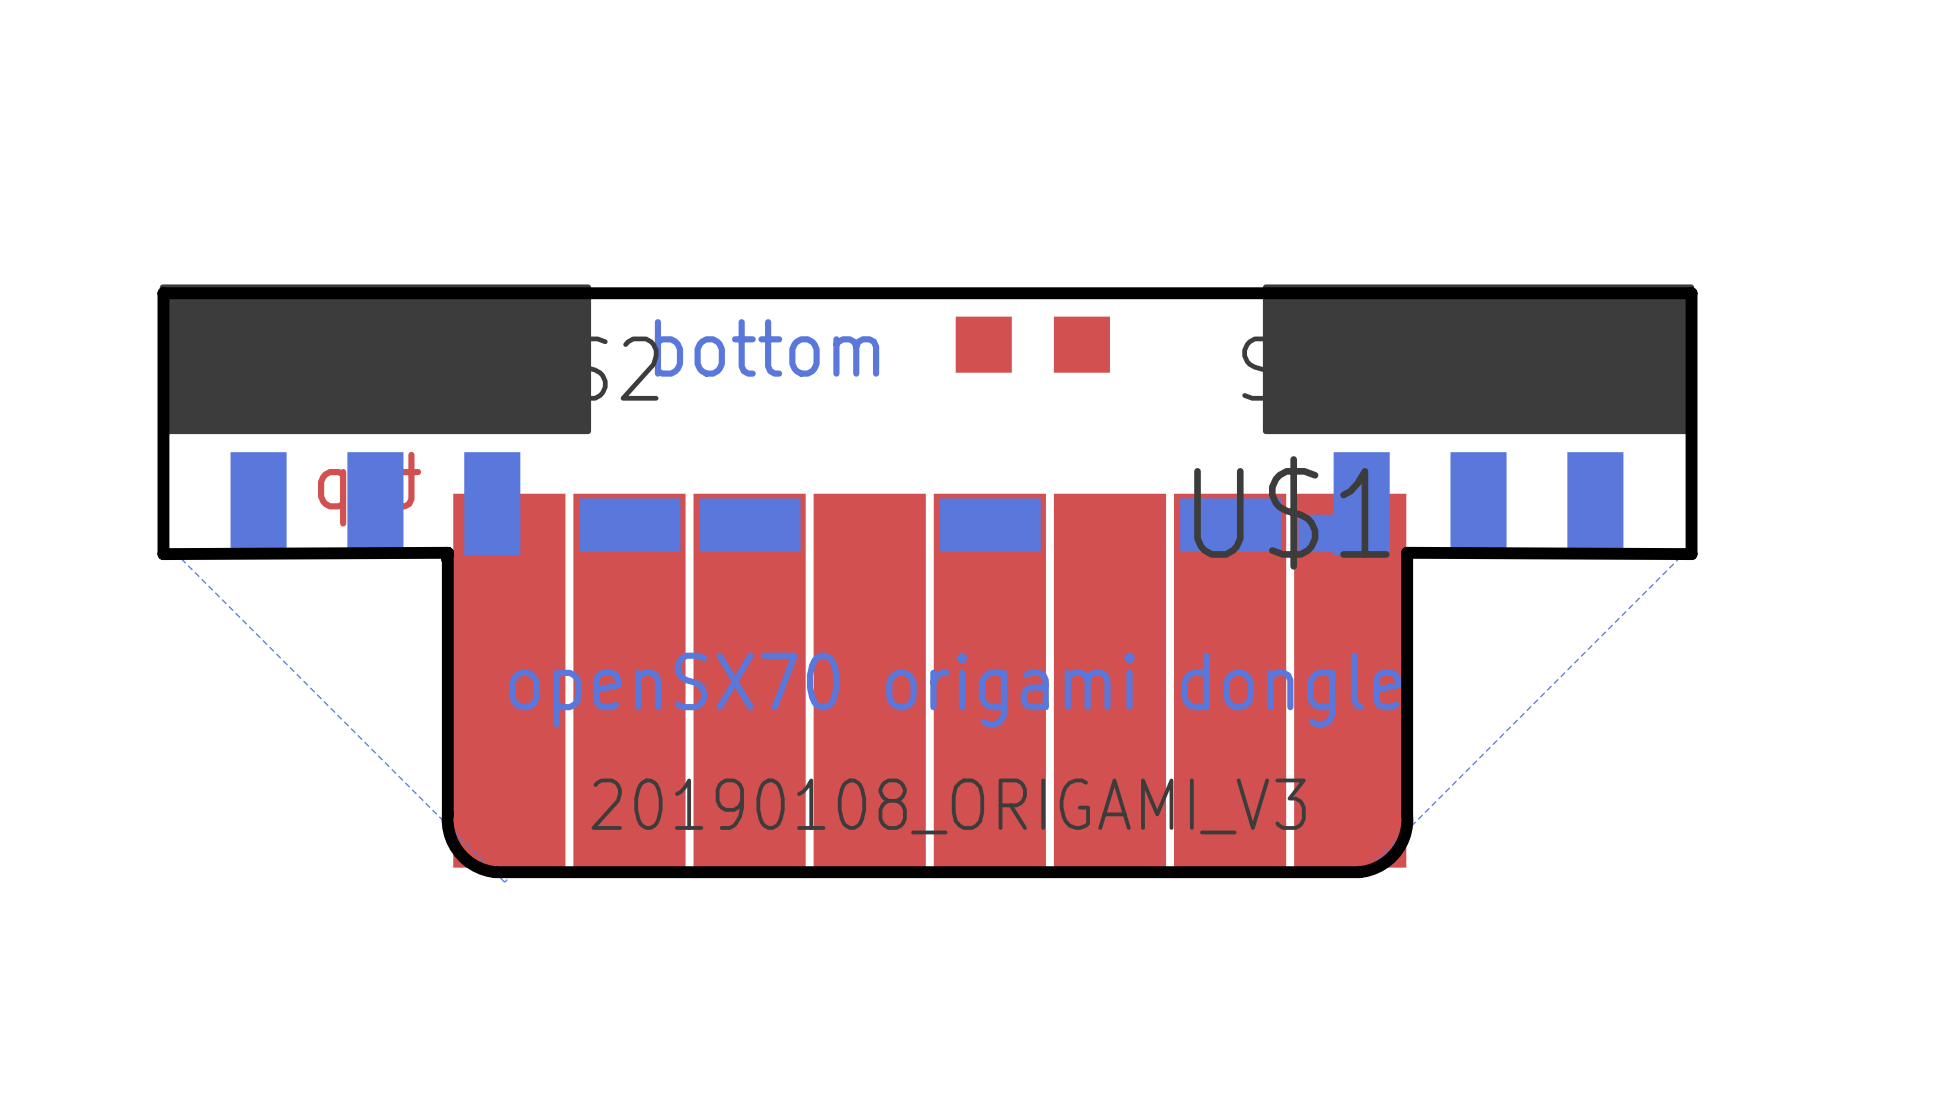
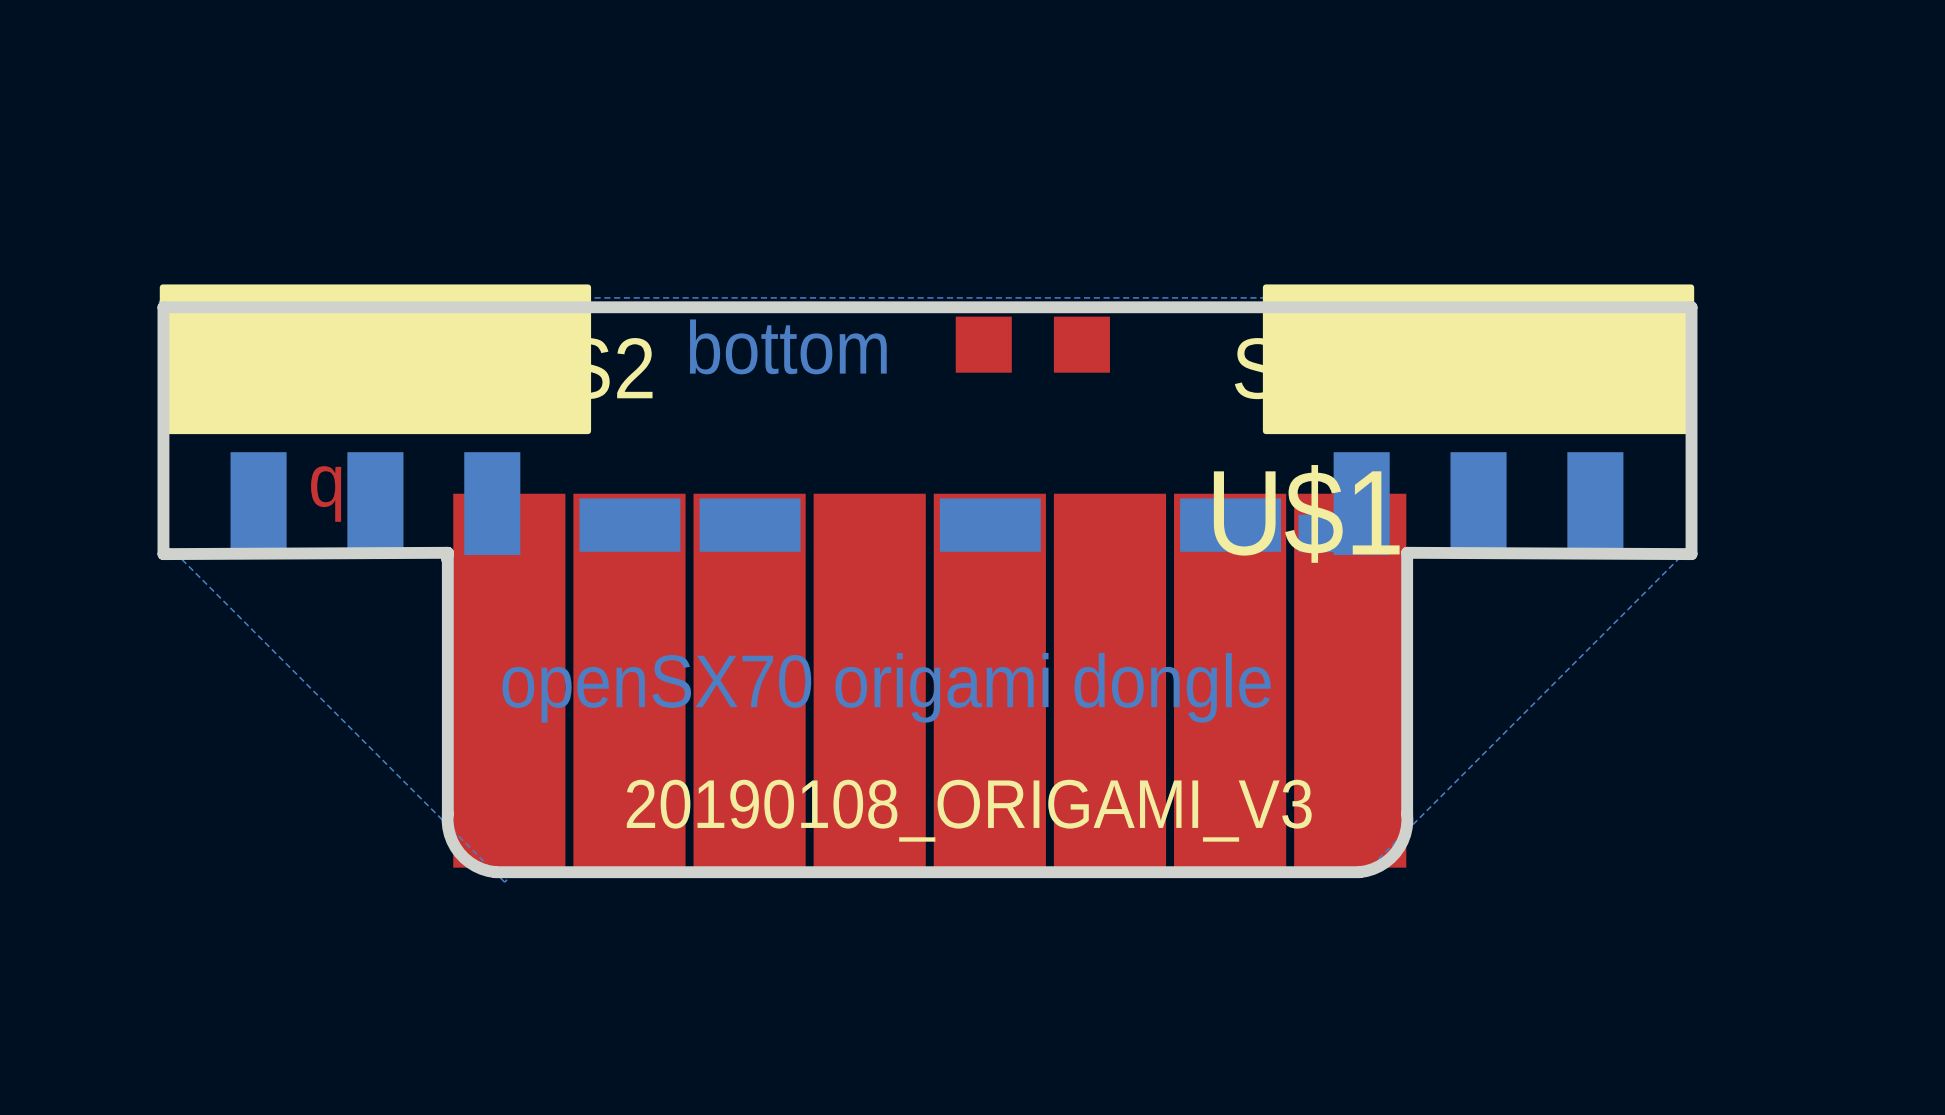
board edge: (1691, 307) (1691, 293) (163, 293) (163, 307) -> (1691, 307) (163, 307)

